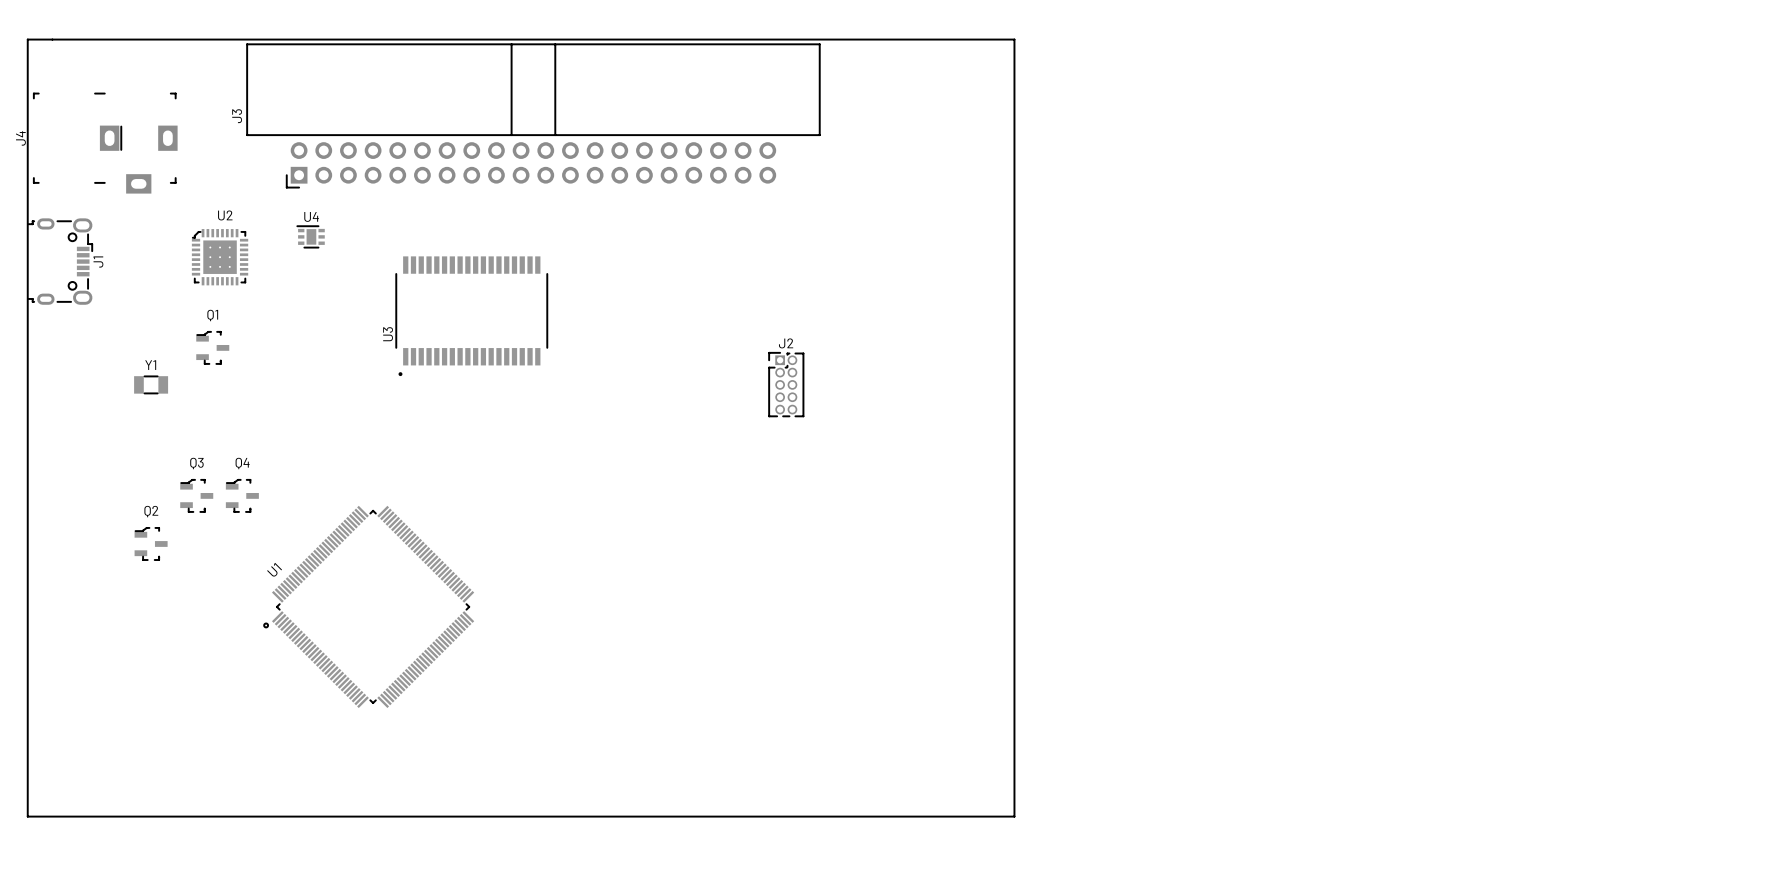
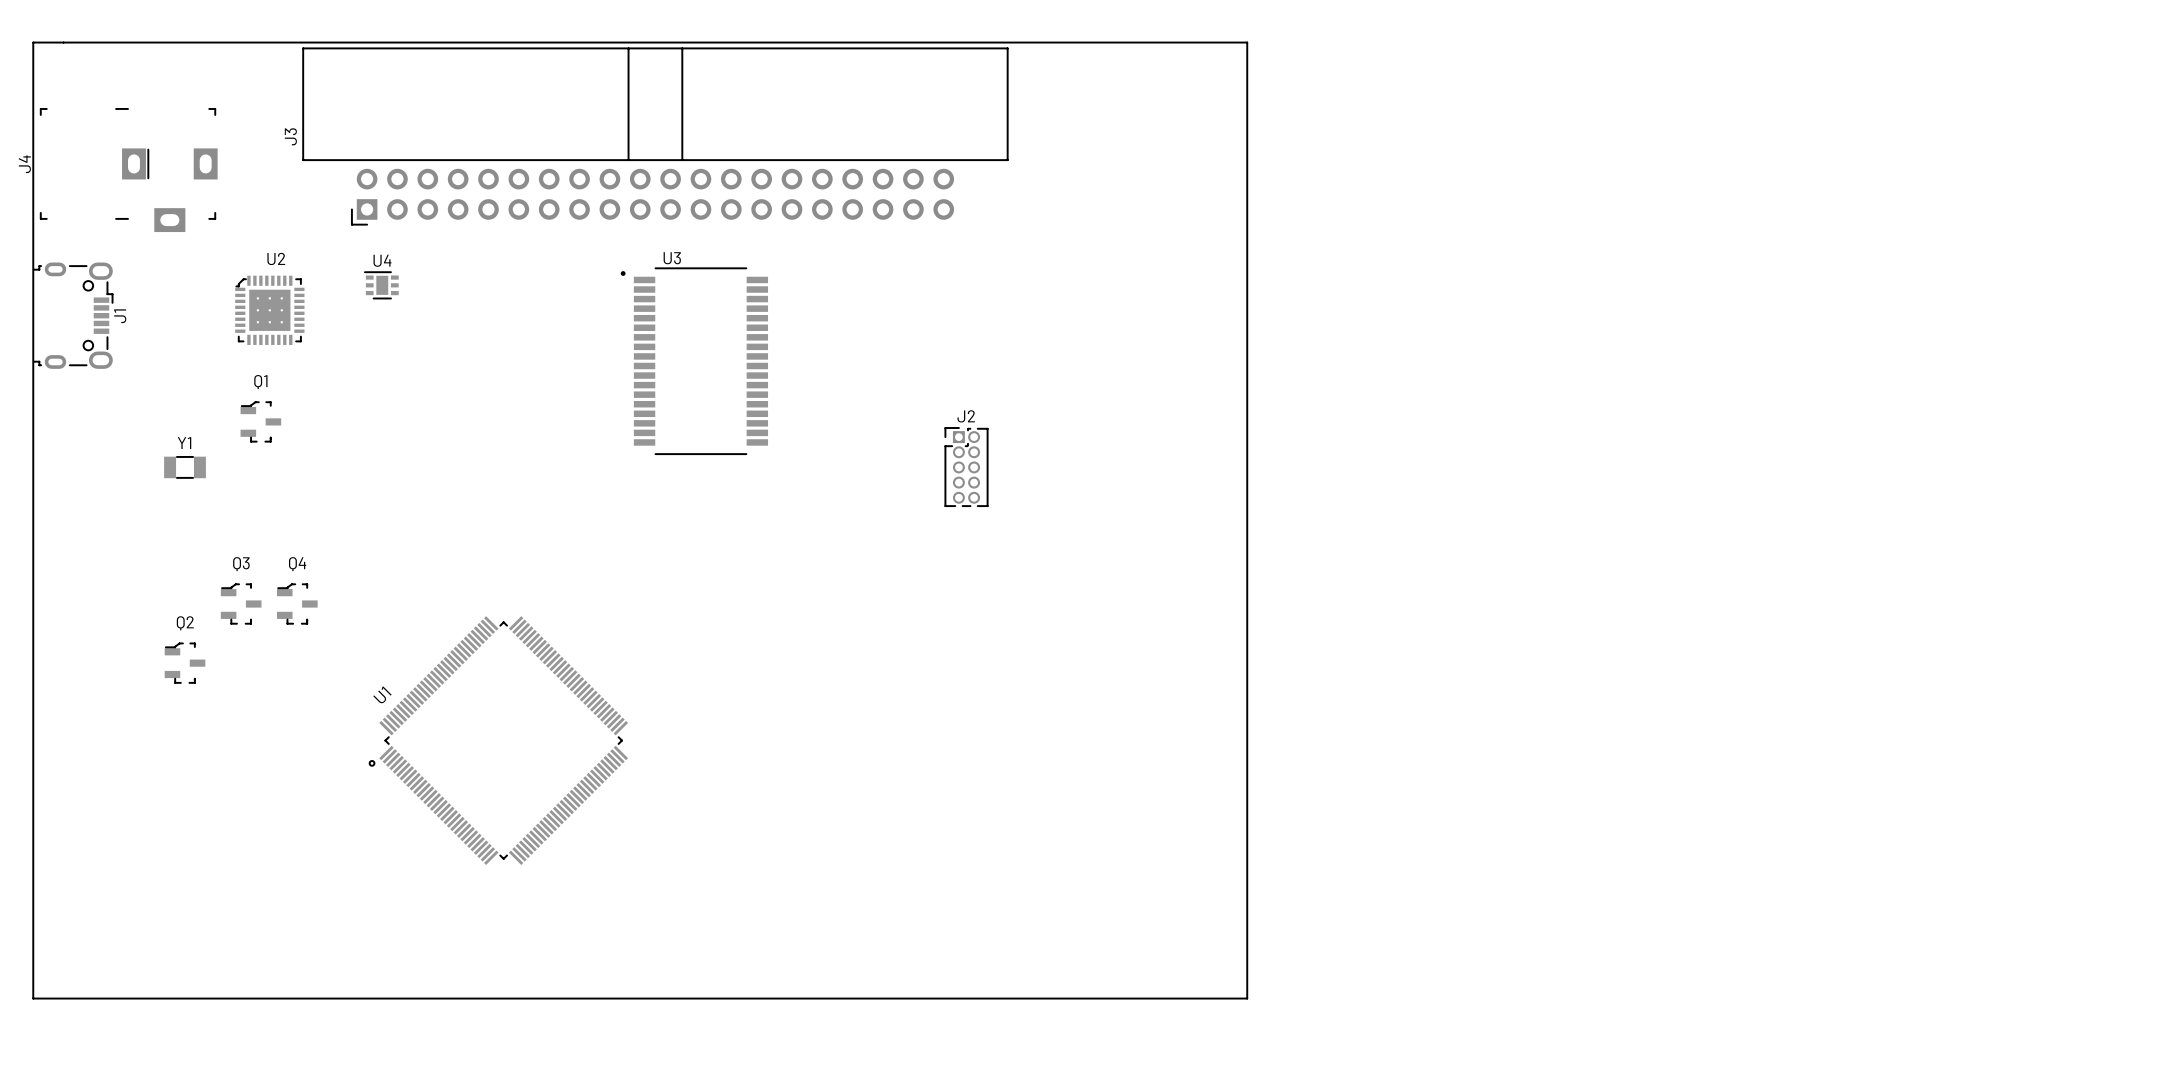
U3 rotation: 0° (471, 316) -> 90° clockwise (694, 361)
U3 position: (471, 316) -> (694, 361)
U1 position: (368, 606) -> (498, 740)

